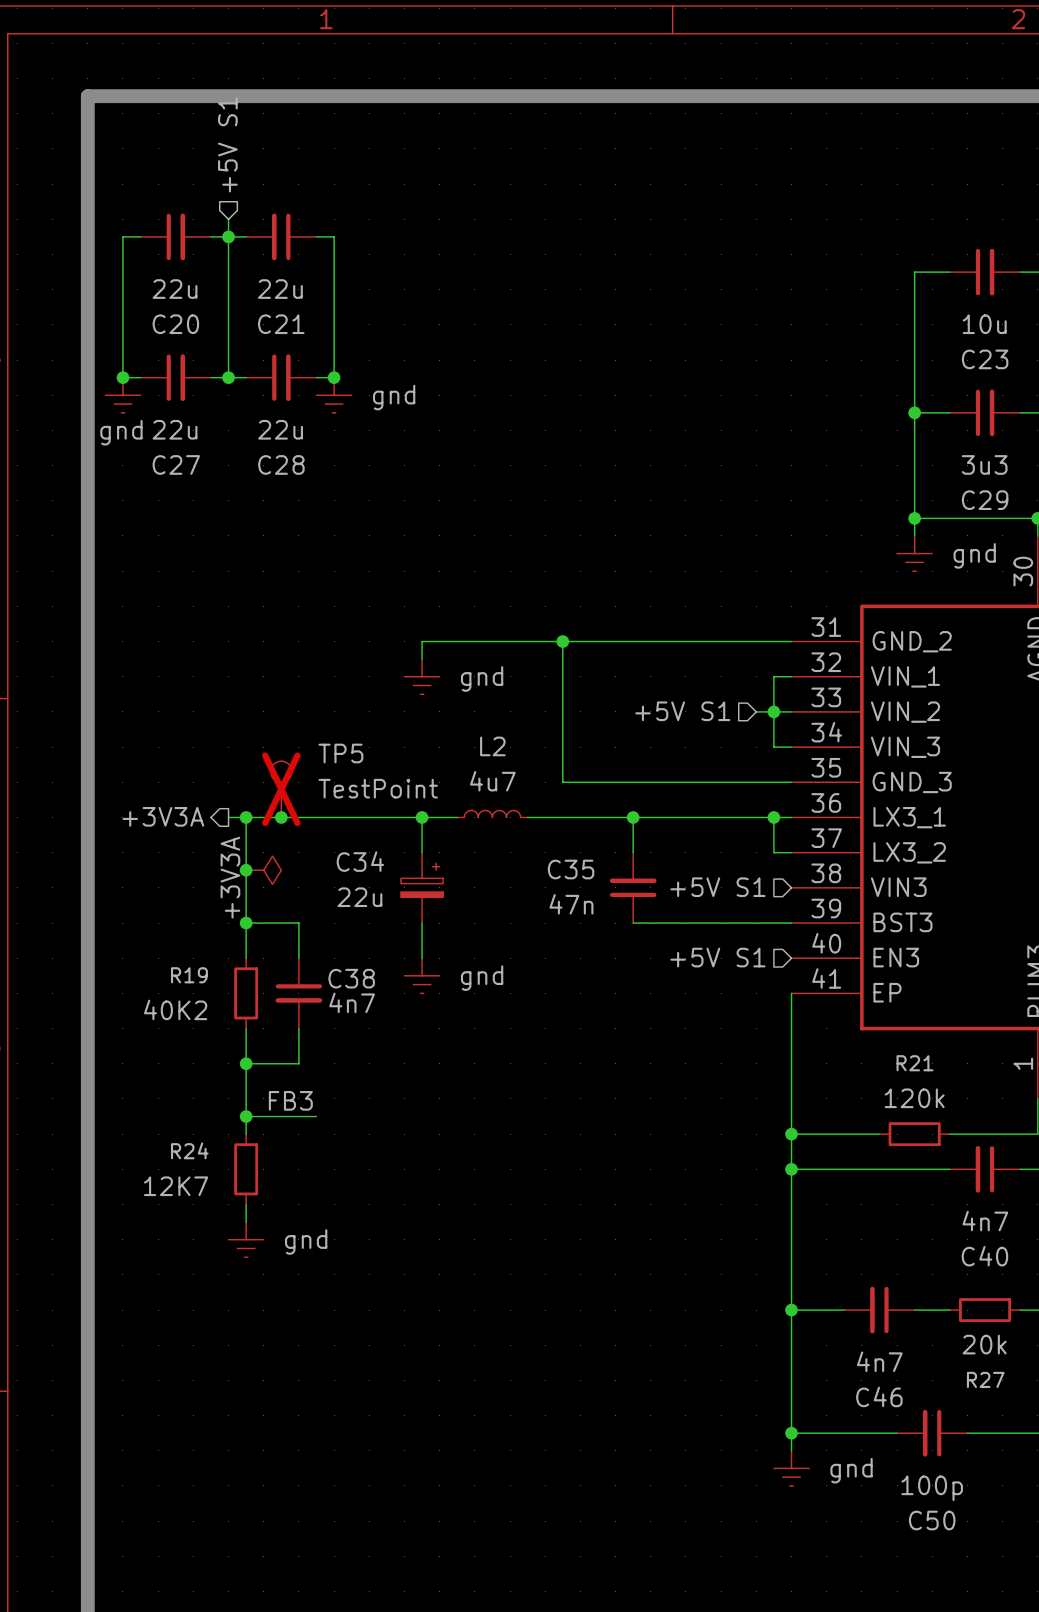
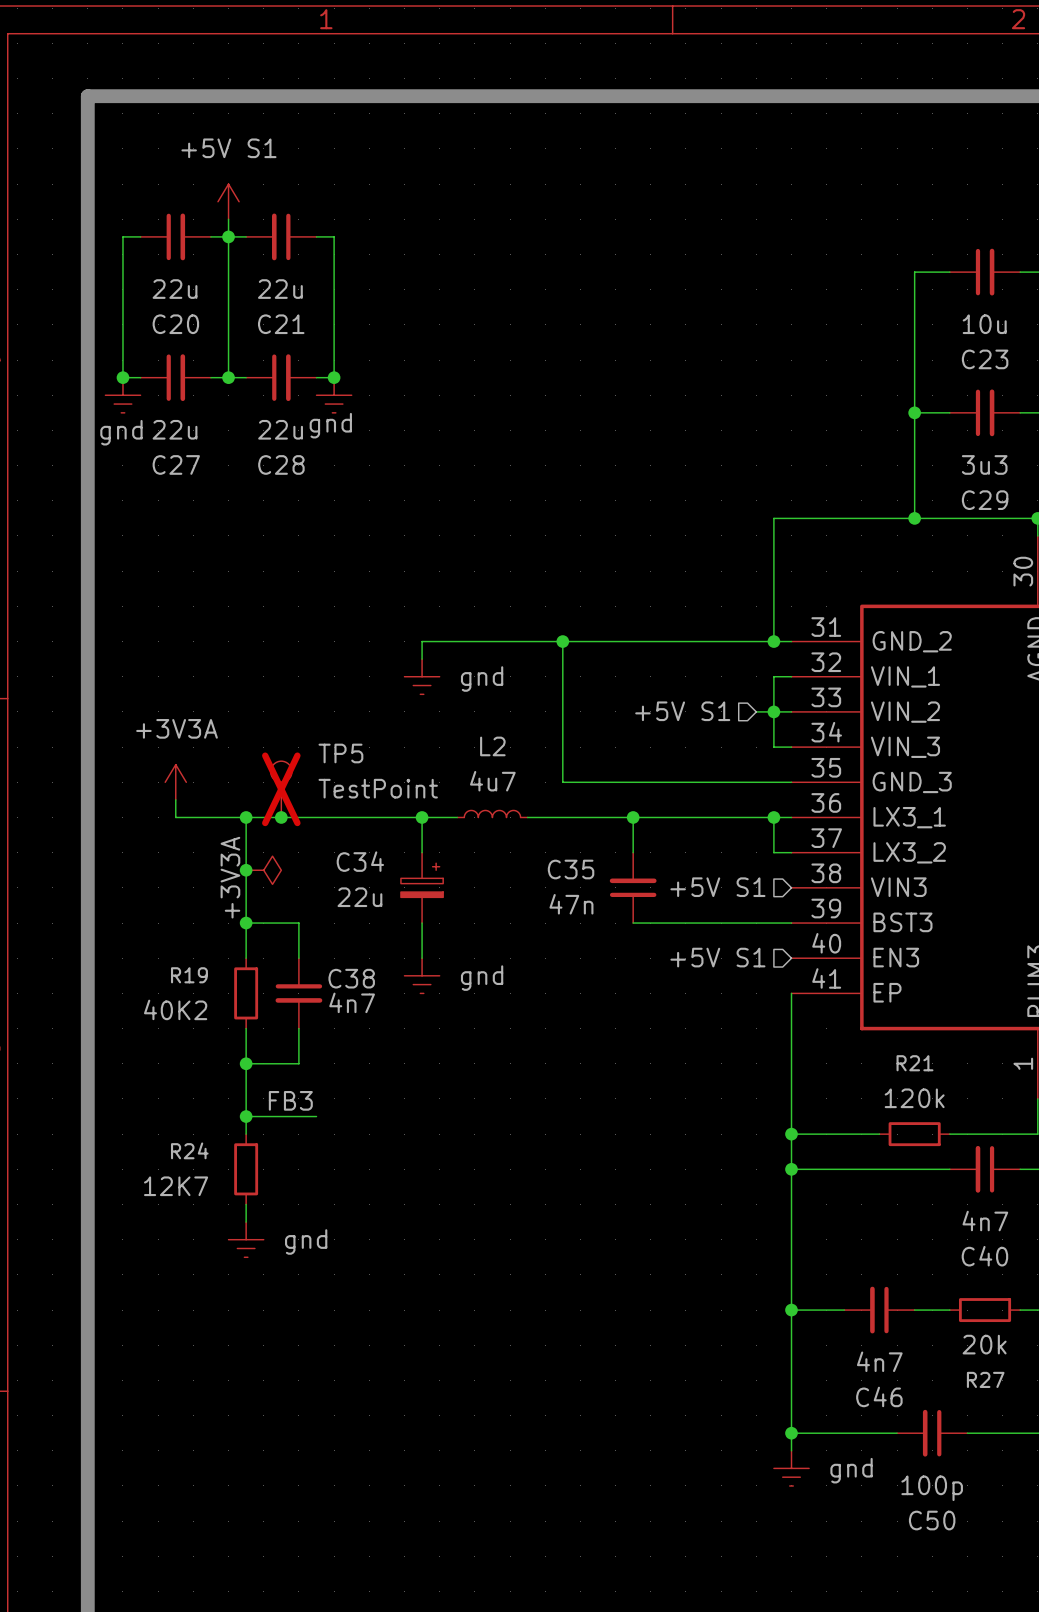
hierarchical label: +5V S1 (227, 144) -> none
power symbol: none -> +5V S1 (228, 201)
power symbol text position: gnd (394, 397) -> gnd (330, 425)
wire: (914, 518) (914, 535) -> (914, 518) (773, 518) (773, 641)
power symbol: gnd (914, 553) -> none
junction: none -> (773, 641)
power symbol: none -> +3V3A (175, 782)
wire: none -> (175, 799) (175, 817) (228, 817)
hierarchical label: +3V3A (163, 816) -> none

